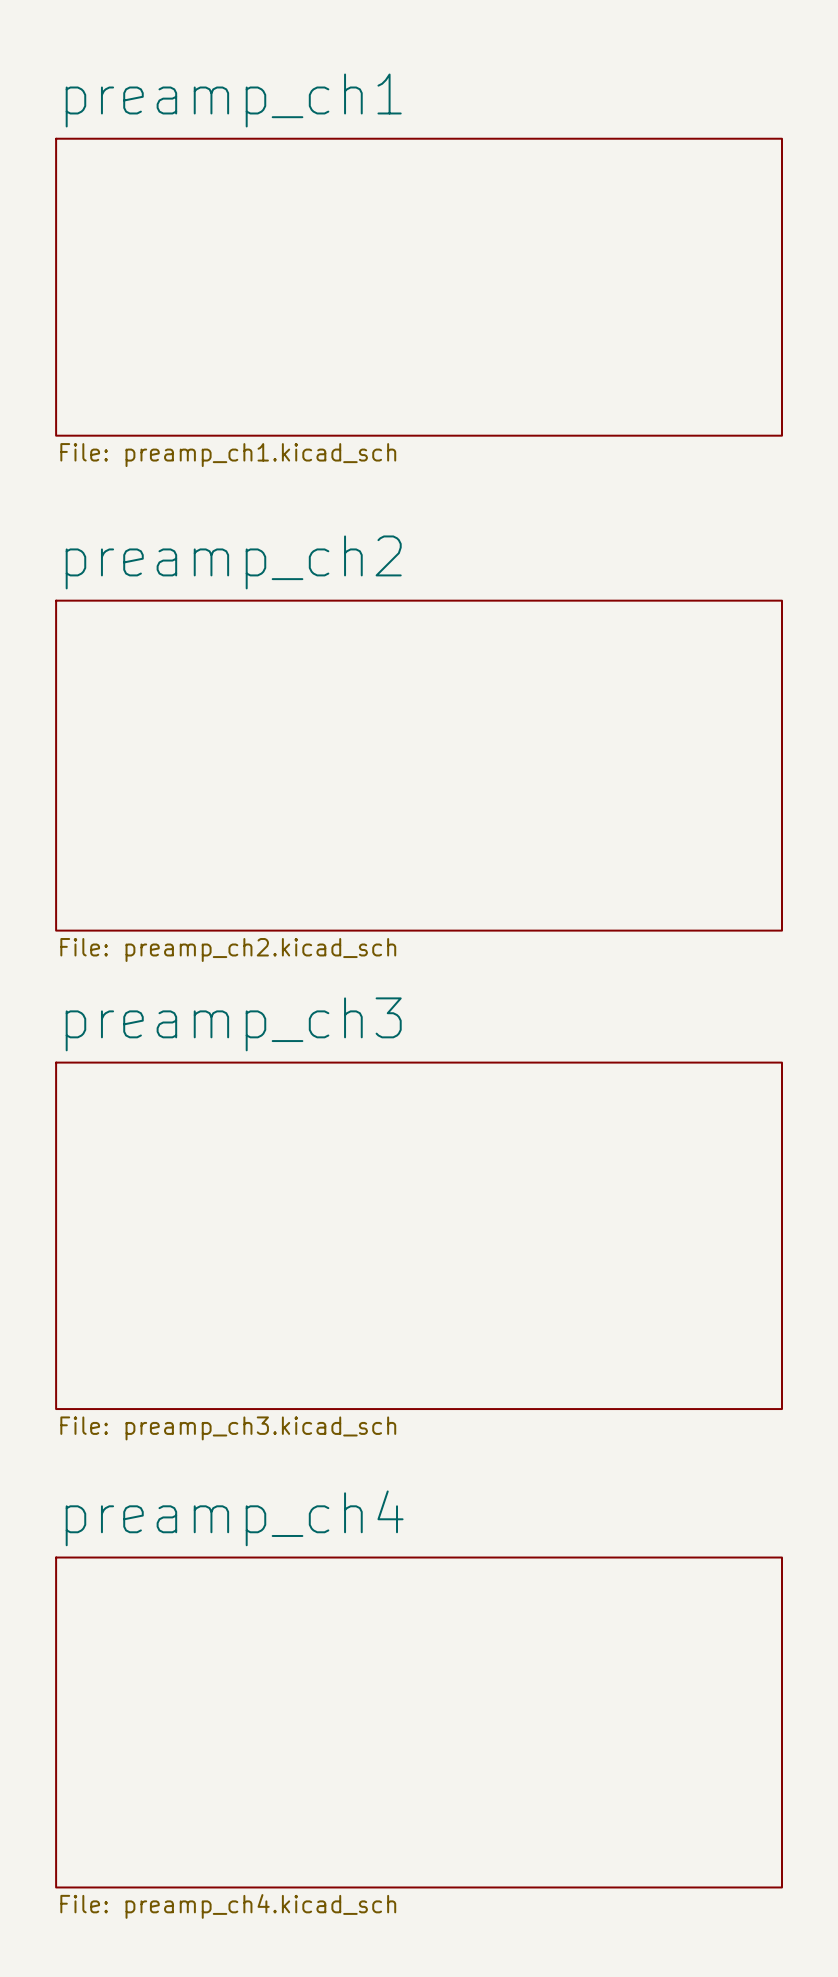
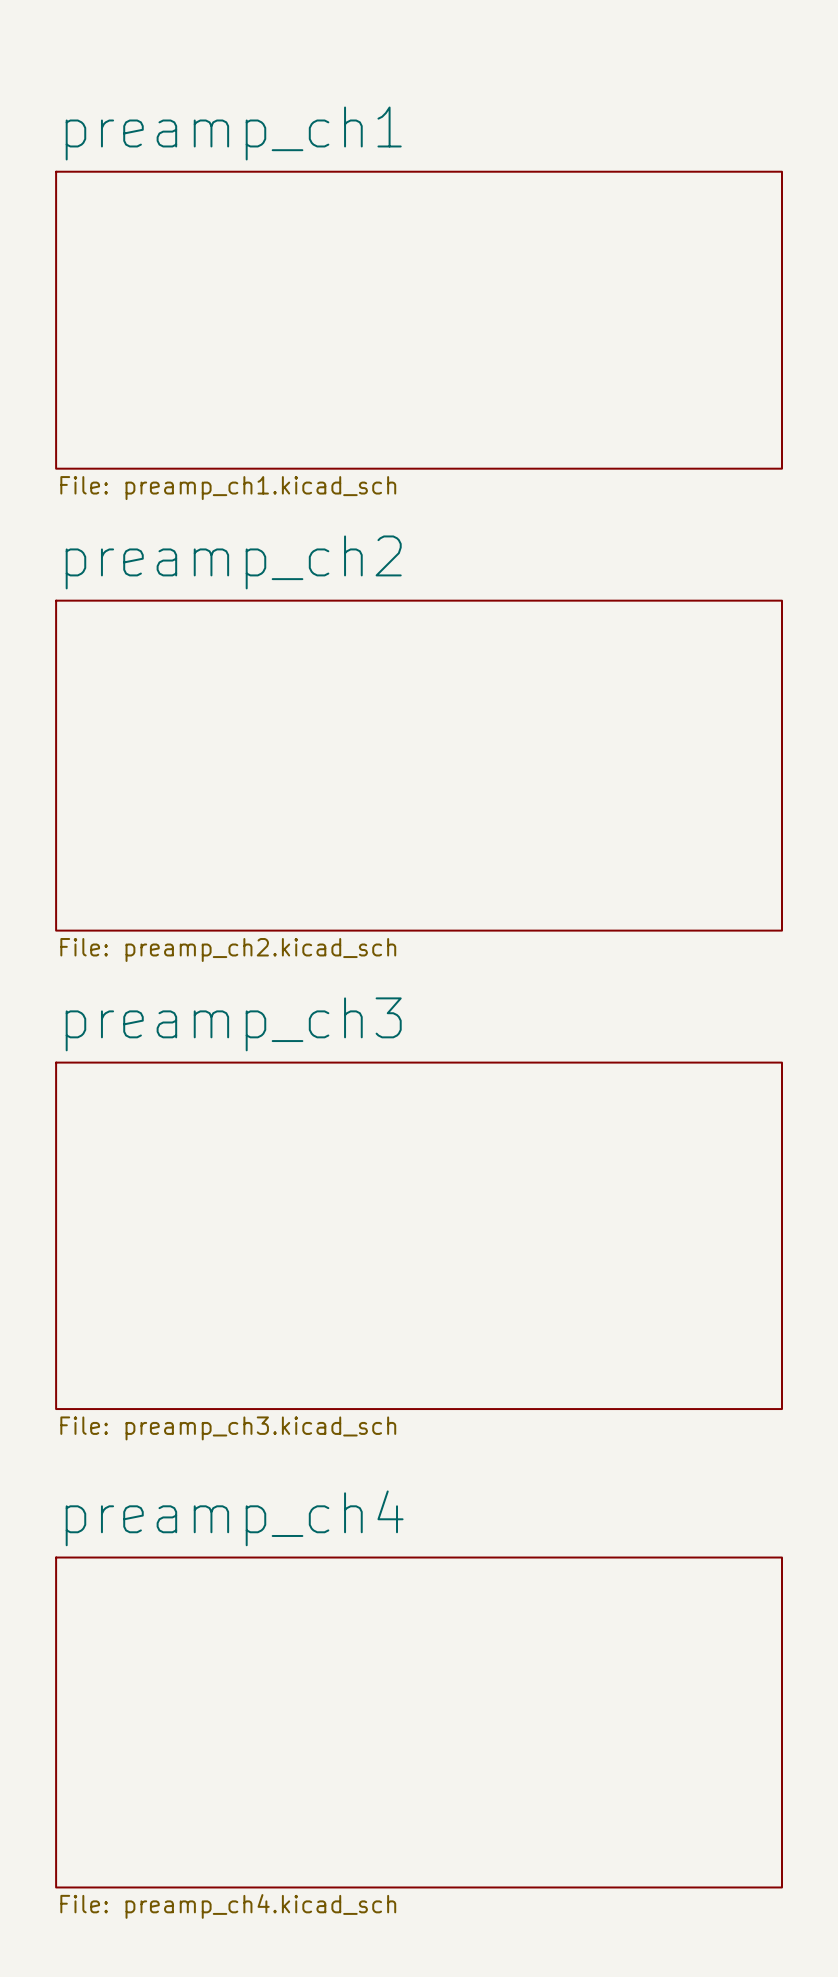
sheet preamp_ch1 position: (419, 287) -> (419, 320)

